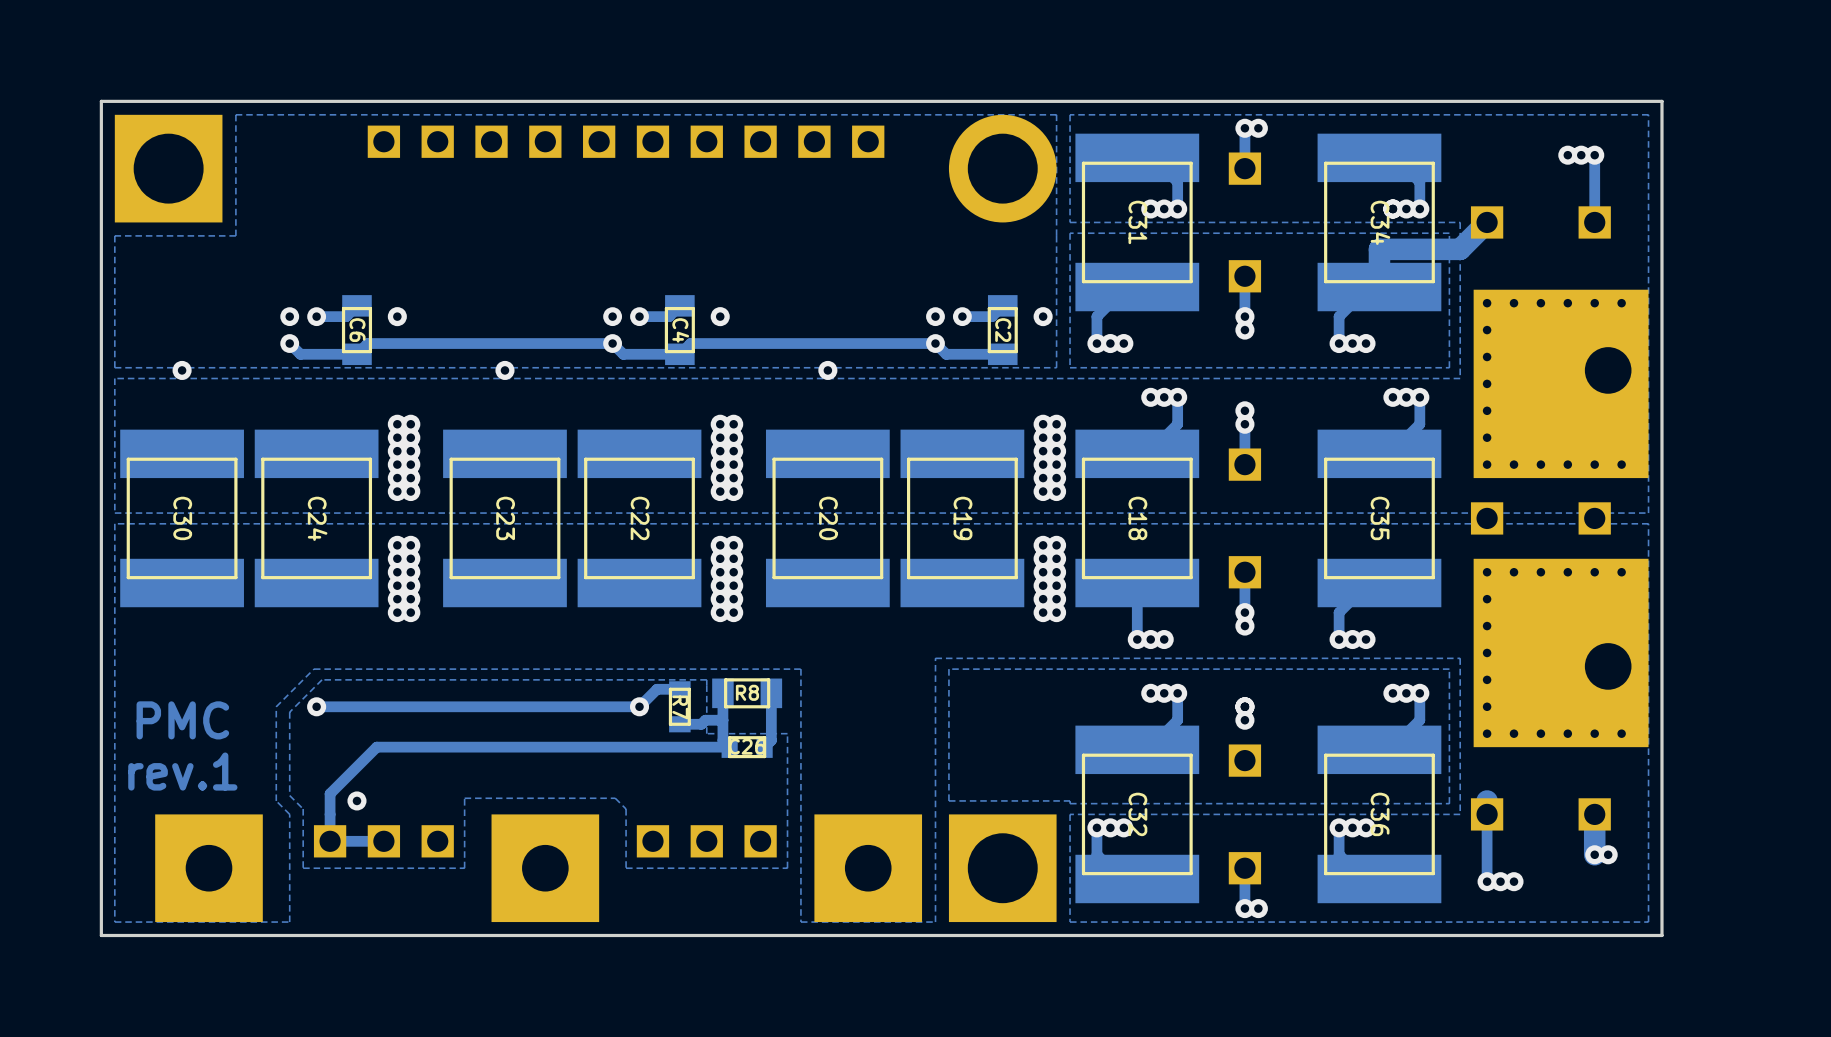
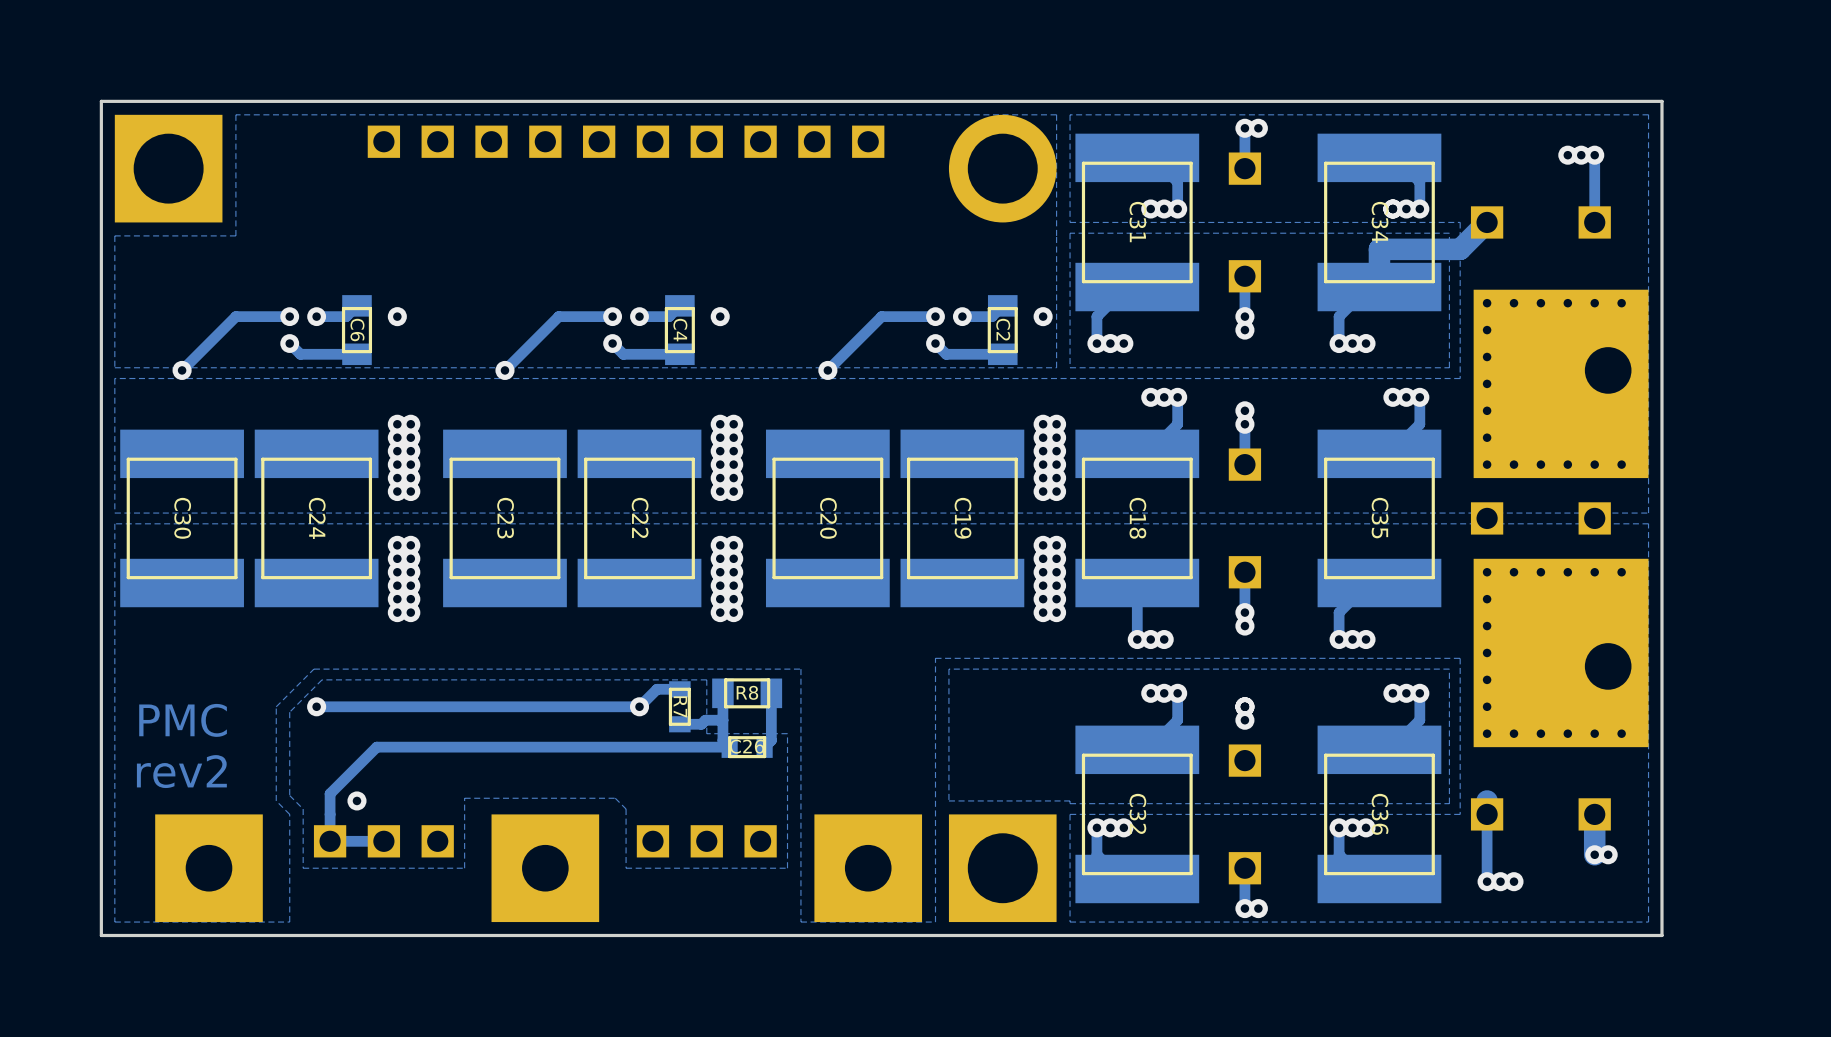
track: none -> (289, 316) (235, 316) (182, 370)
track: none -> (612, 316) (558, 316) (504, 370)
track: none -> (935, 316) (881, 316) (827, 370)
track: (612, 343) (367, 343) (356, 354) -> none
track: (935, 343) (690, 343) (679, 354) -> none
text: rev.1 (182, 771) -> rev2 (181, 771)

